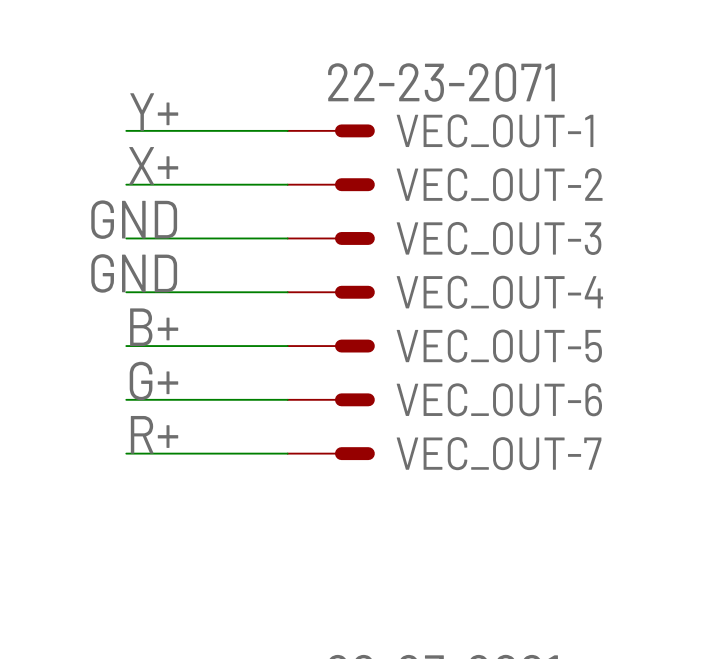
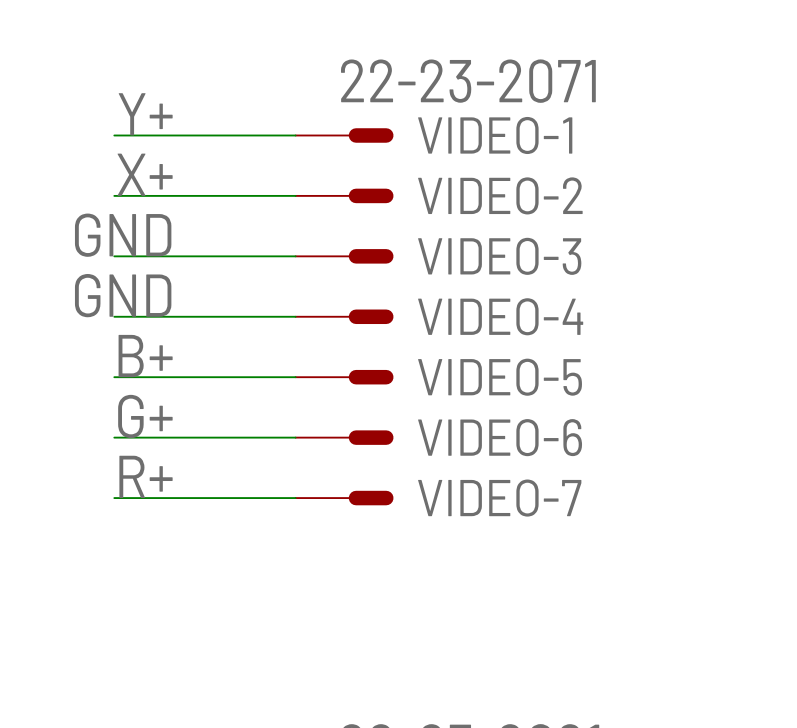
VEC_OUT-1 name: VEC_OUT-1 (495, 130) -> VIDEO-1 (495, 135)
VEC_OUT-2 name: VEC_OUT-2 (499, 184) -> VIDEO-2 (500, 195)
VEC_OUT-3 name: VEC_OUT-3 (499, 238) -> VIDEO-3 (499, 256)
VEC_OUT-4 name: VEC_OUT-4 (499, 292) -> VIDEO-4 (500, 316)
VEC_OUT-5 name: VEC_OUT-5 (499, 346) -> VIDEO-5 (500, 377)
VEC_OUT-6 name: VEC_OUT-6 (499, 399) -> VIDEO-6 (500, 437)
VEC_OUT-7 name: VEC_OUT-7 (499, 453) -> VIDEO-7 (499, 498)

